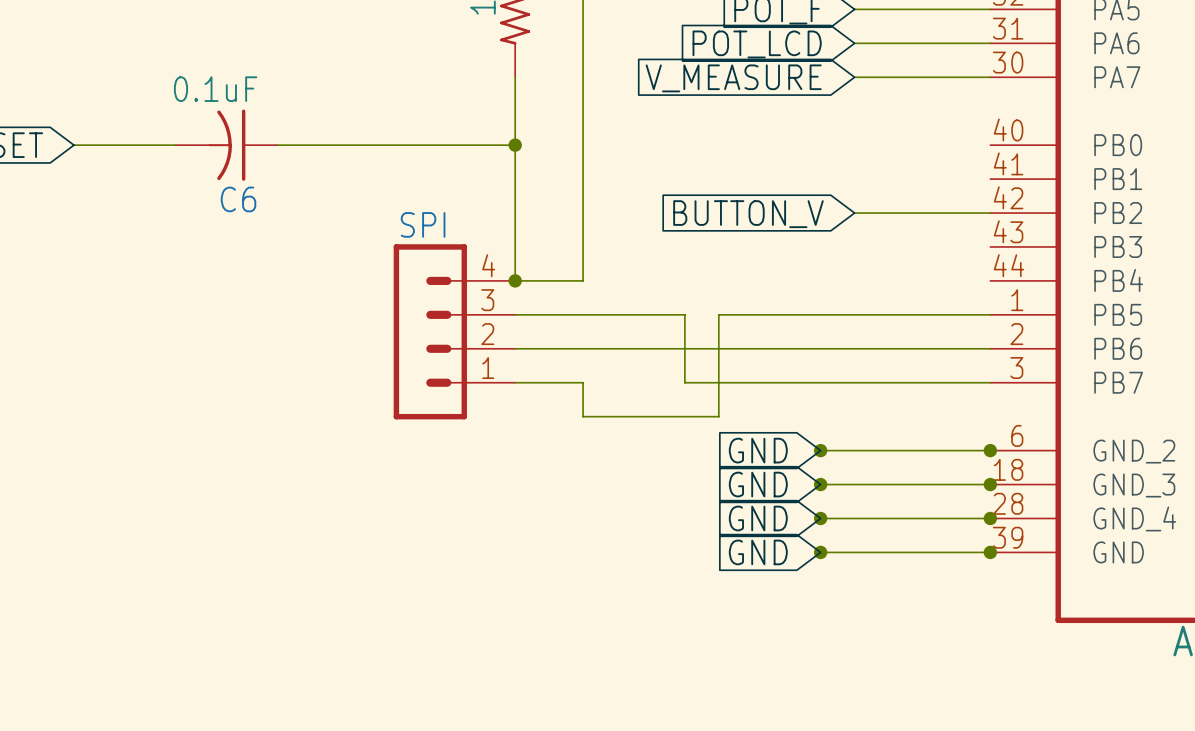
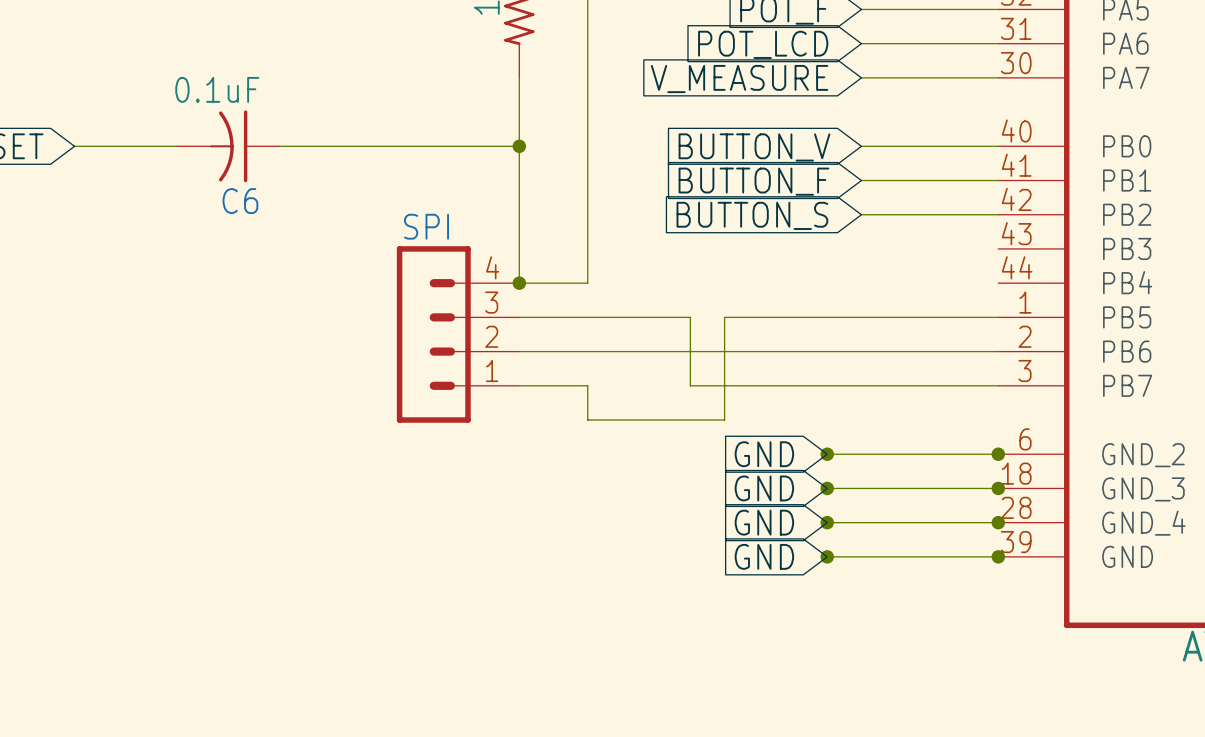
wire: none -> (861, 146) (998, 146)
global label: none -> BUTTON_V (754, 147)
wire: none -> (861, 180) (998, 180)
global label: none -> BUTTON_F (753, 181)
global label: BUTTON_V (748, 214) -> BUTTON_S (752, 215)

